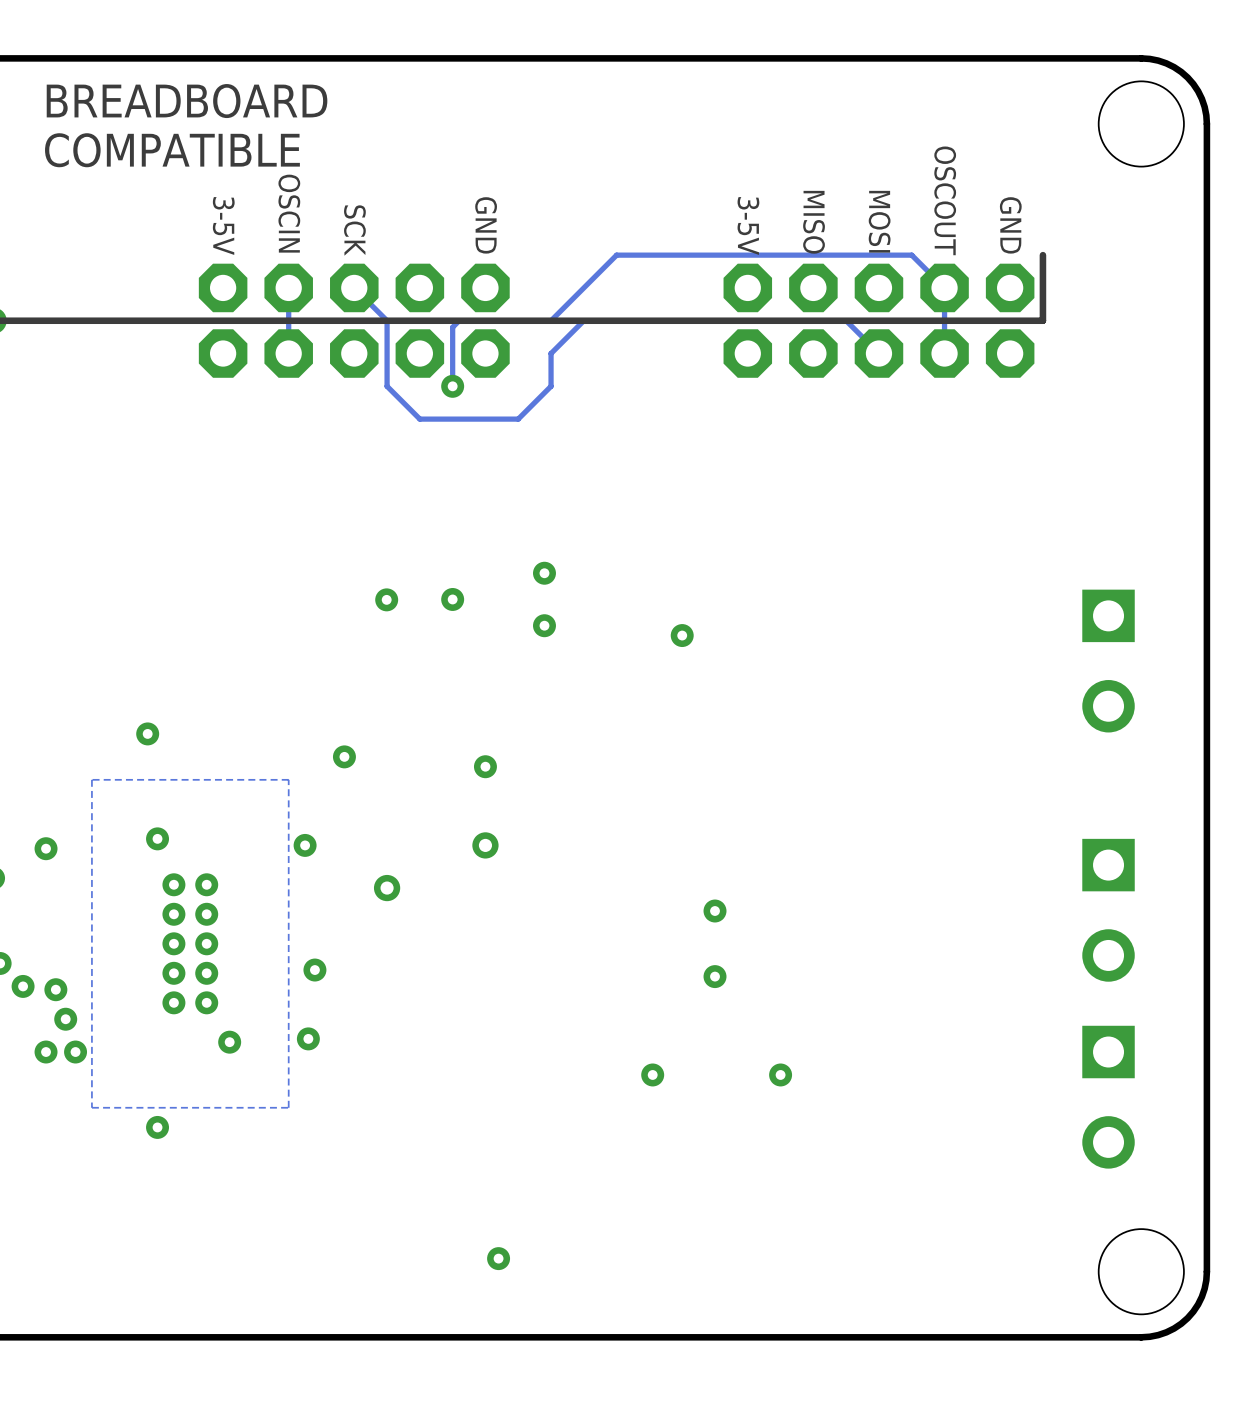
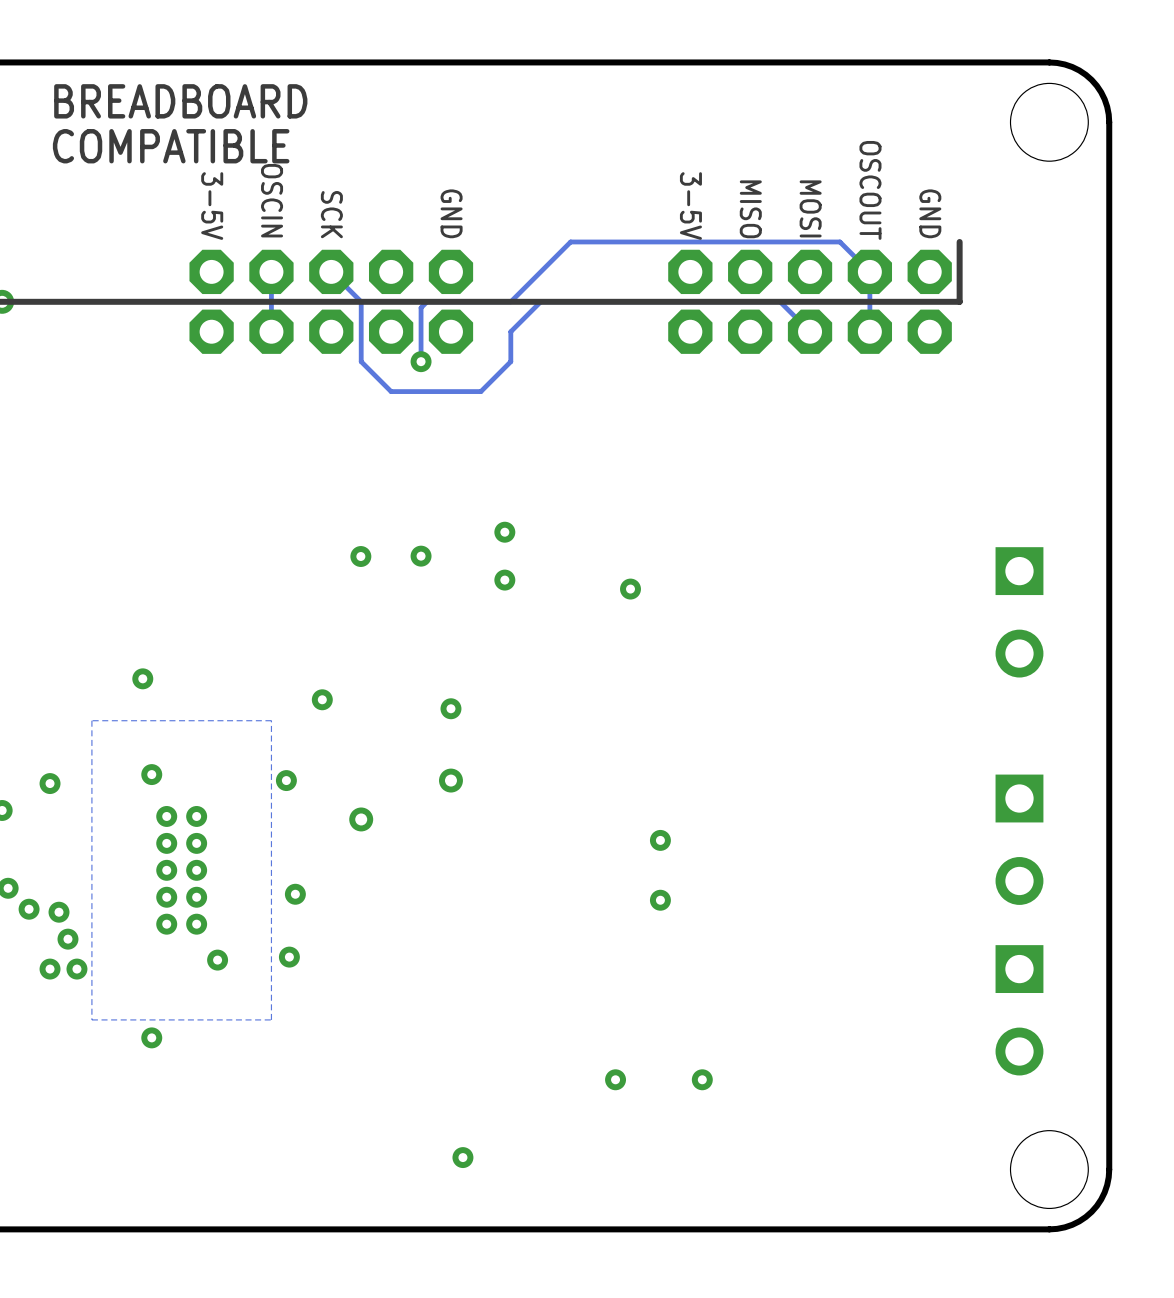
via: (652, 1074) -> none
via: (780, 1074) -> none
via: none -> (615, 1079)
via: none -> (702, 1079)

